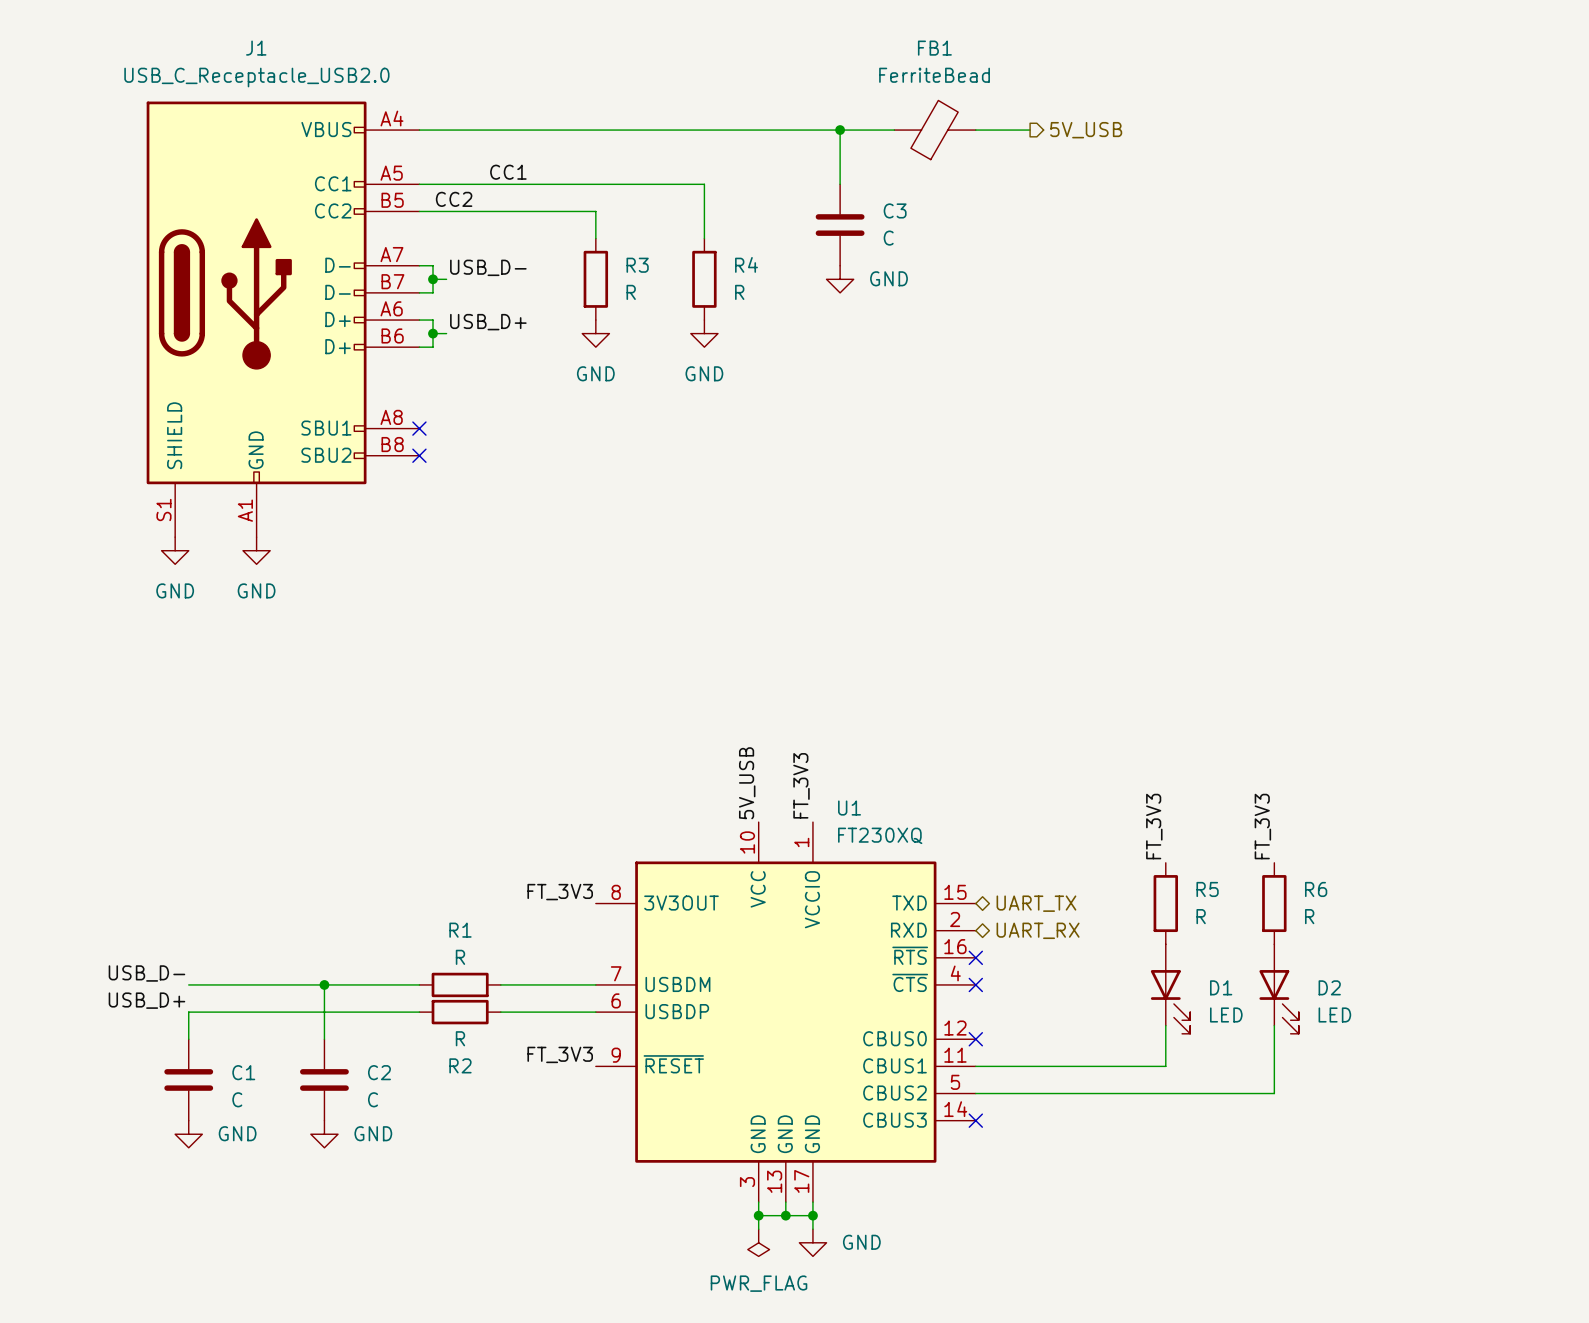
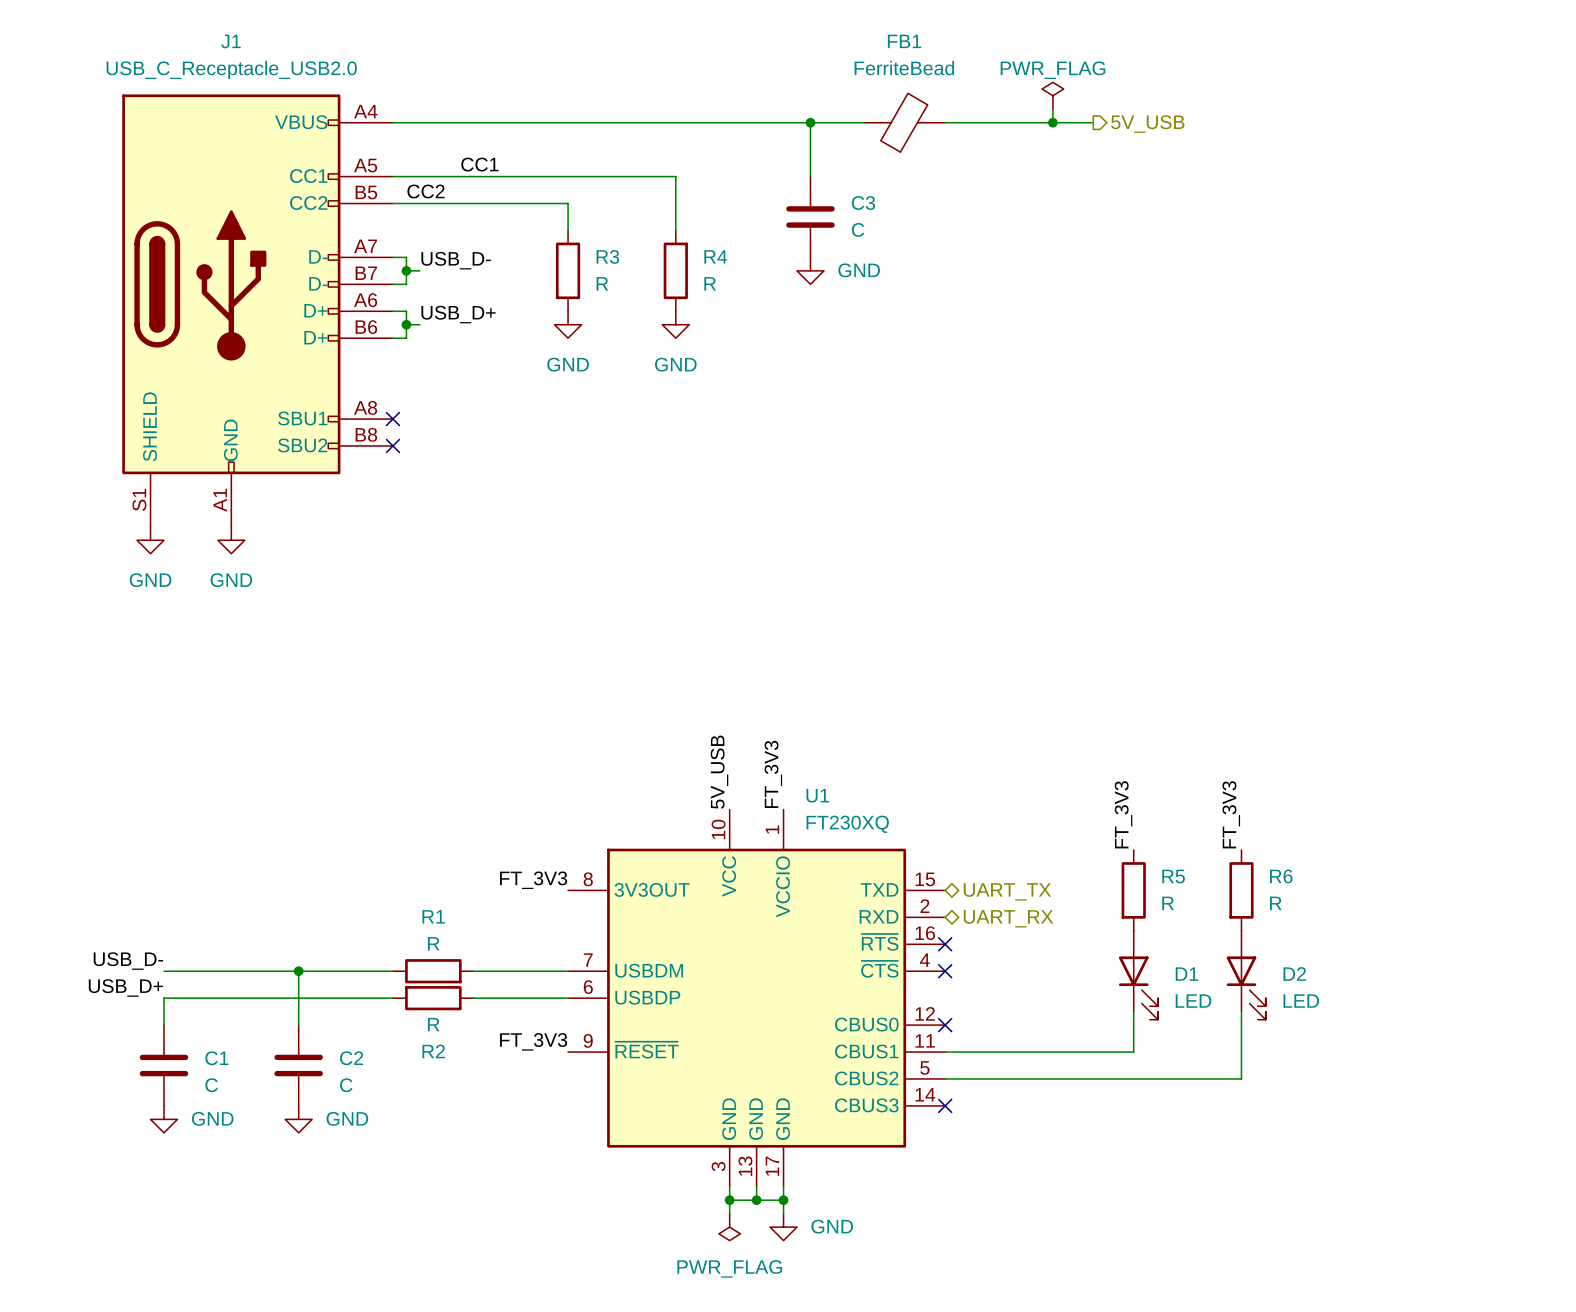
power symbol: none -> PWR_FLAG (1052, 95)
wire: none -> (999, 122) (1093, 122)
junction: none -> (1052, 122)
hierarchical label position: 5V_USB (1086, 130) -> 5V_USB (1147, 124)

